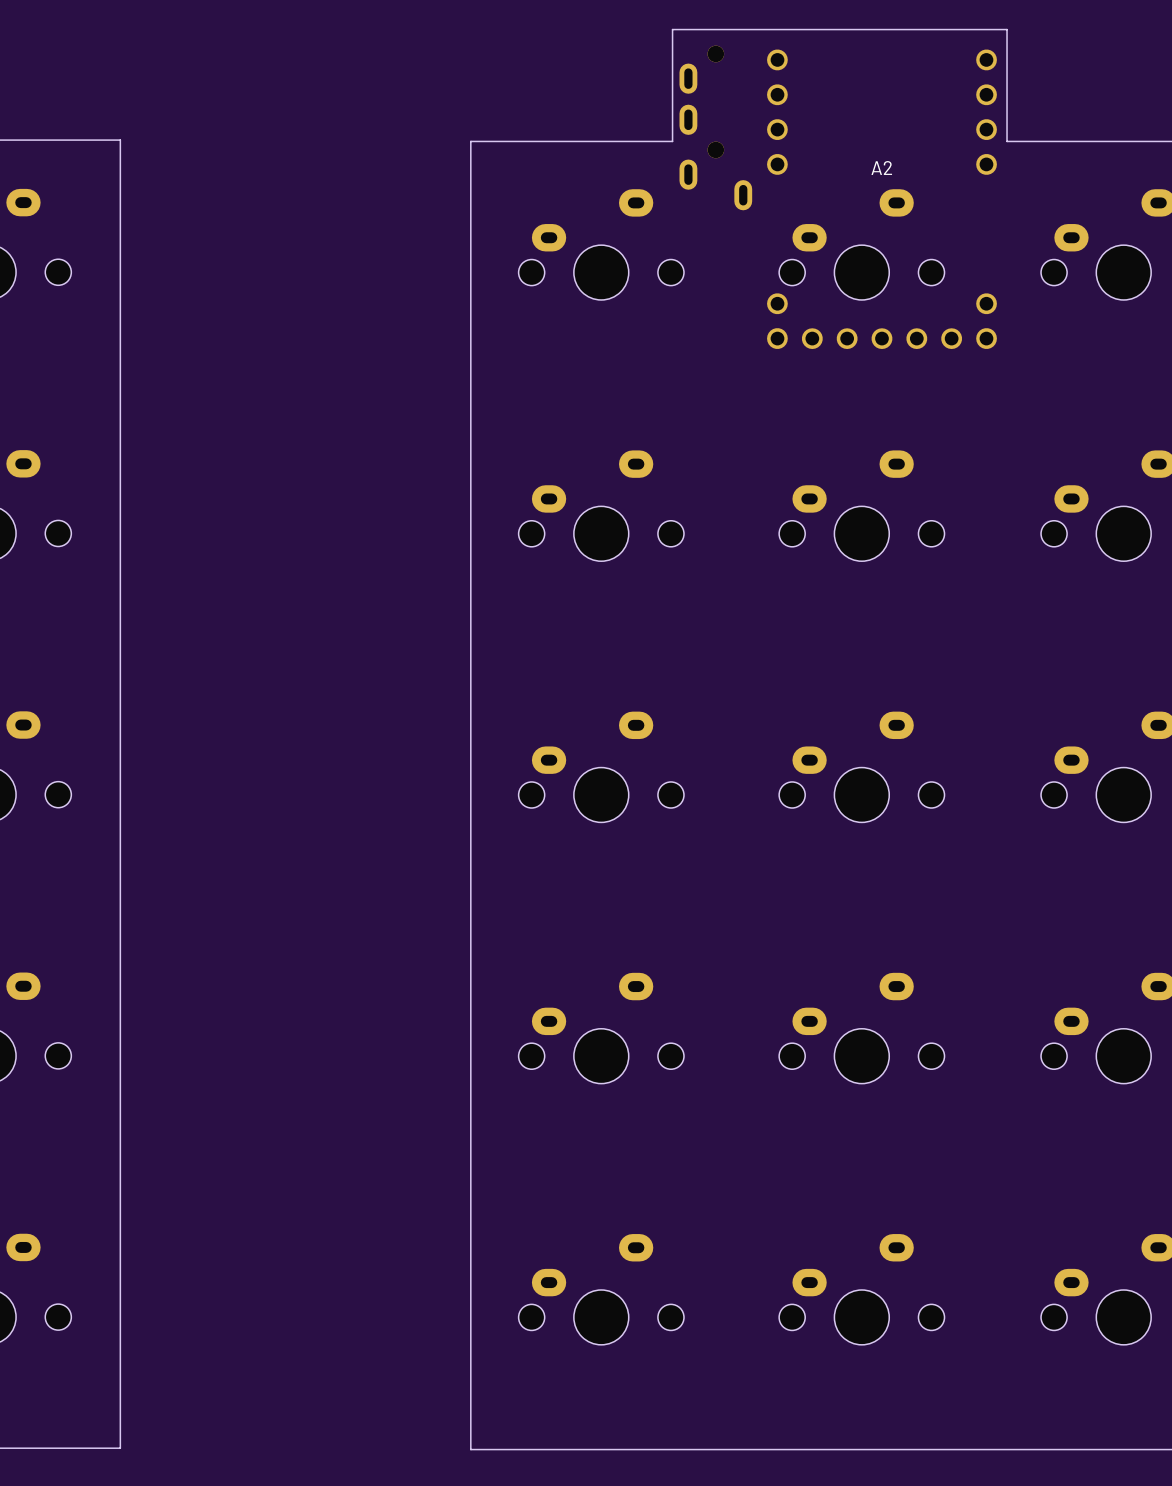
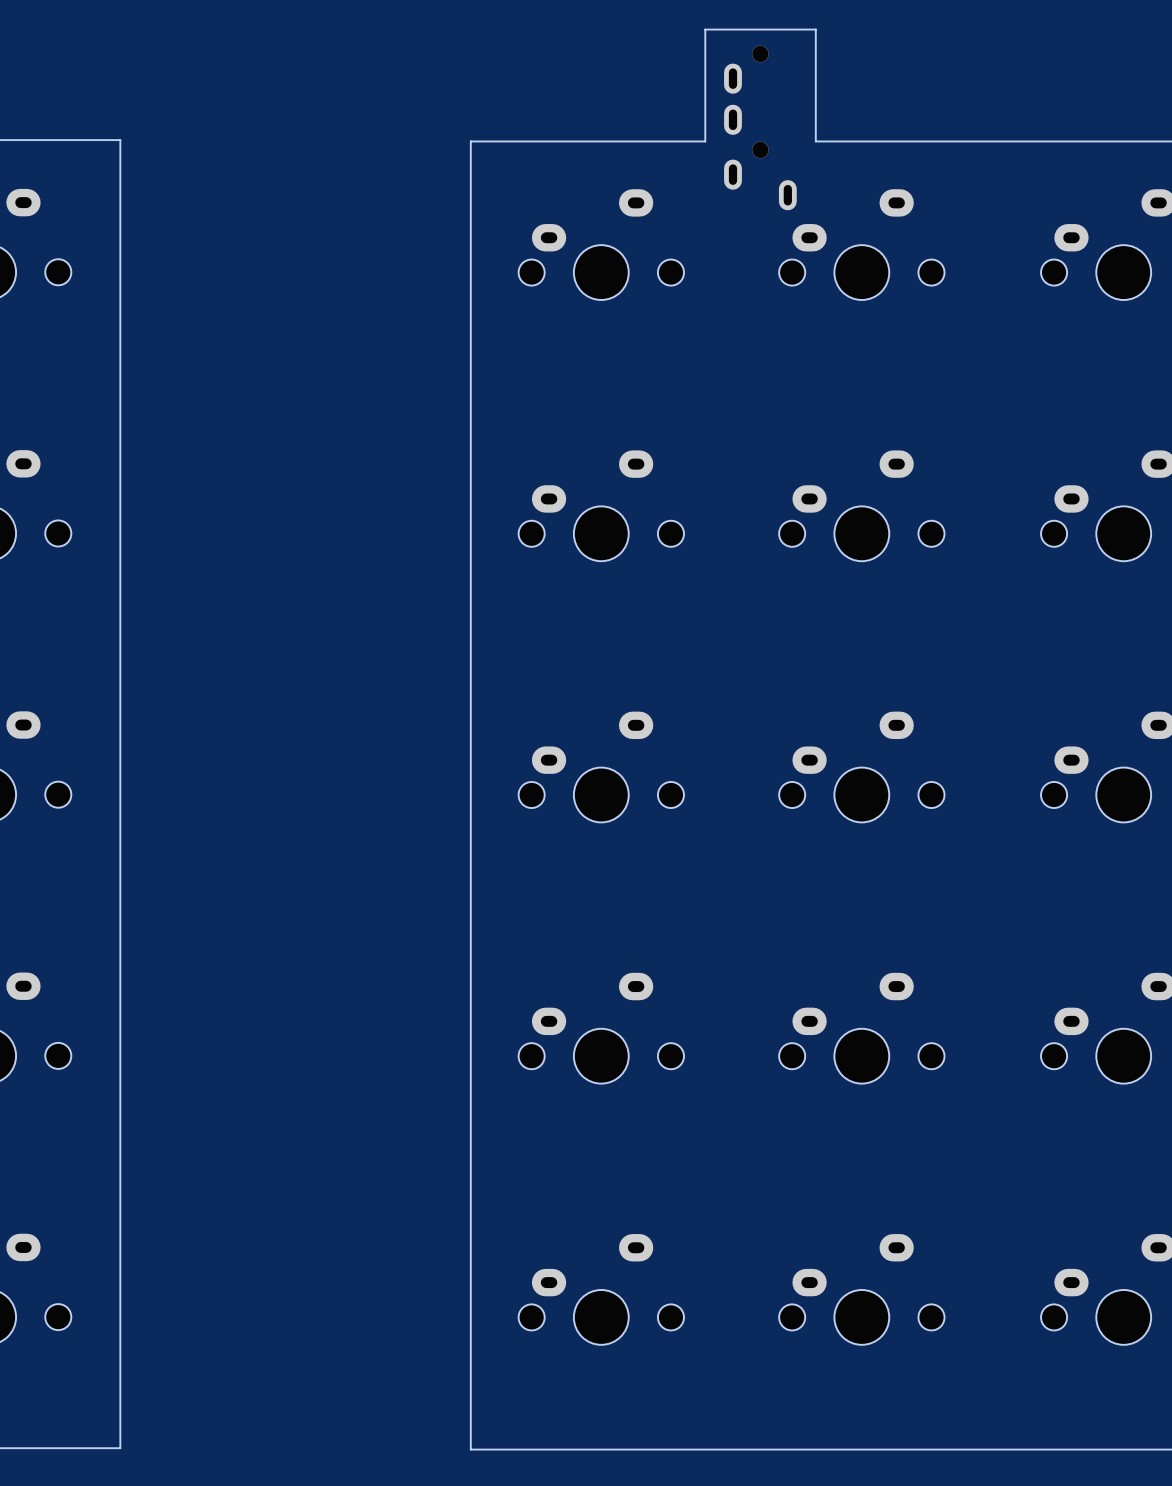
board edge: (705, 29) (672, 29) (672, 141) -> (705, 29) (705, 141) (672, 141)
board edge: (815, 29) (1007, 29) (1007, 141) -> (815, 29) (815, 141) (1007, 141)
part position: (715, 127) -> (760, 127)
A2: (881, 199) -> none

